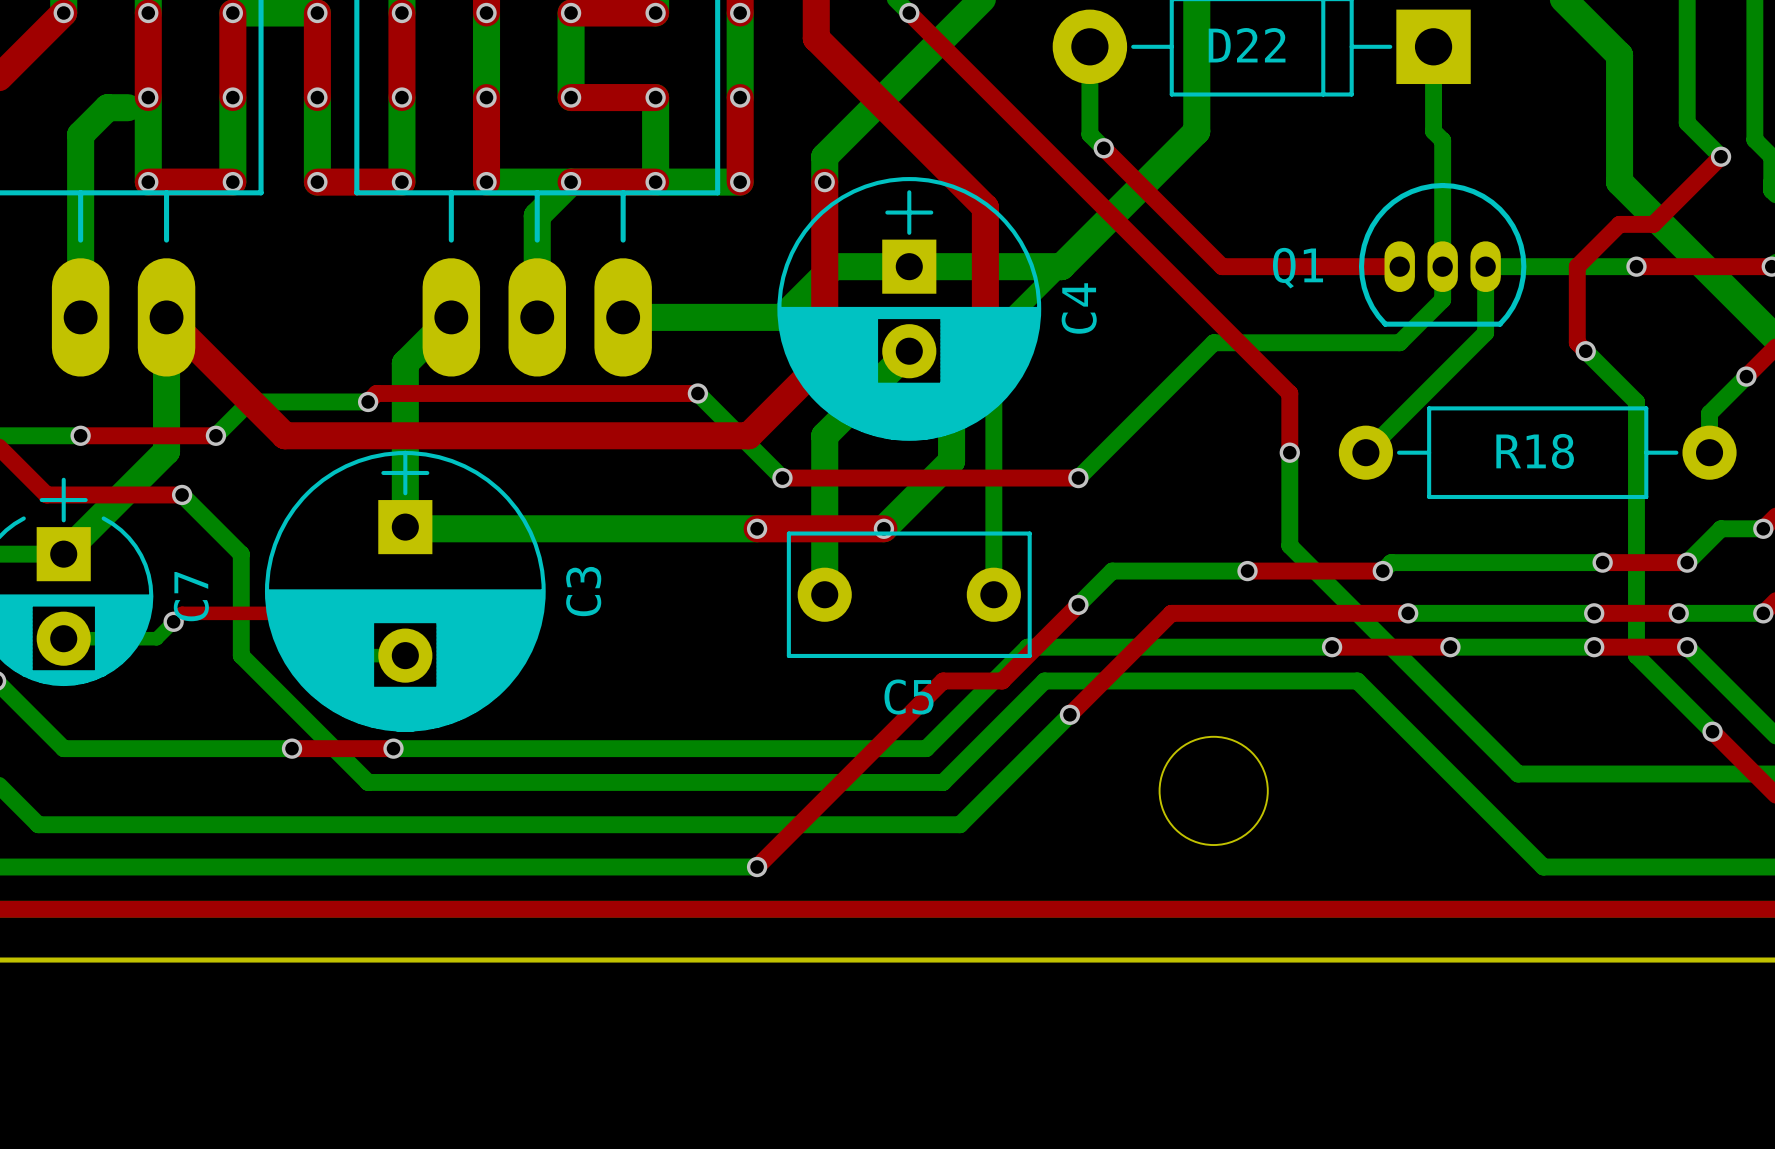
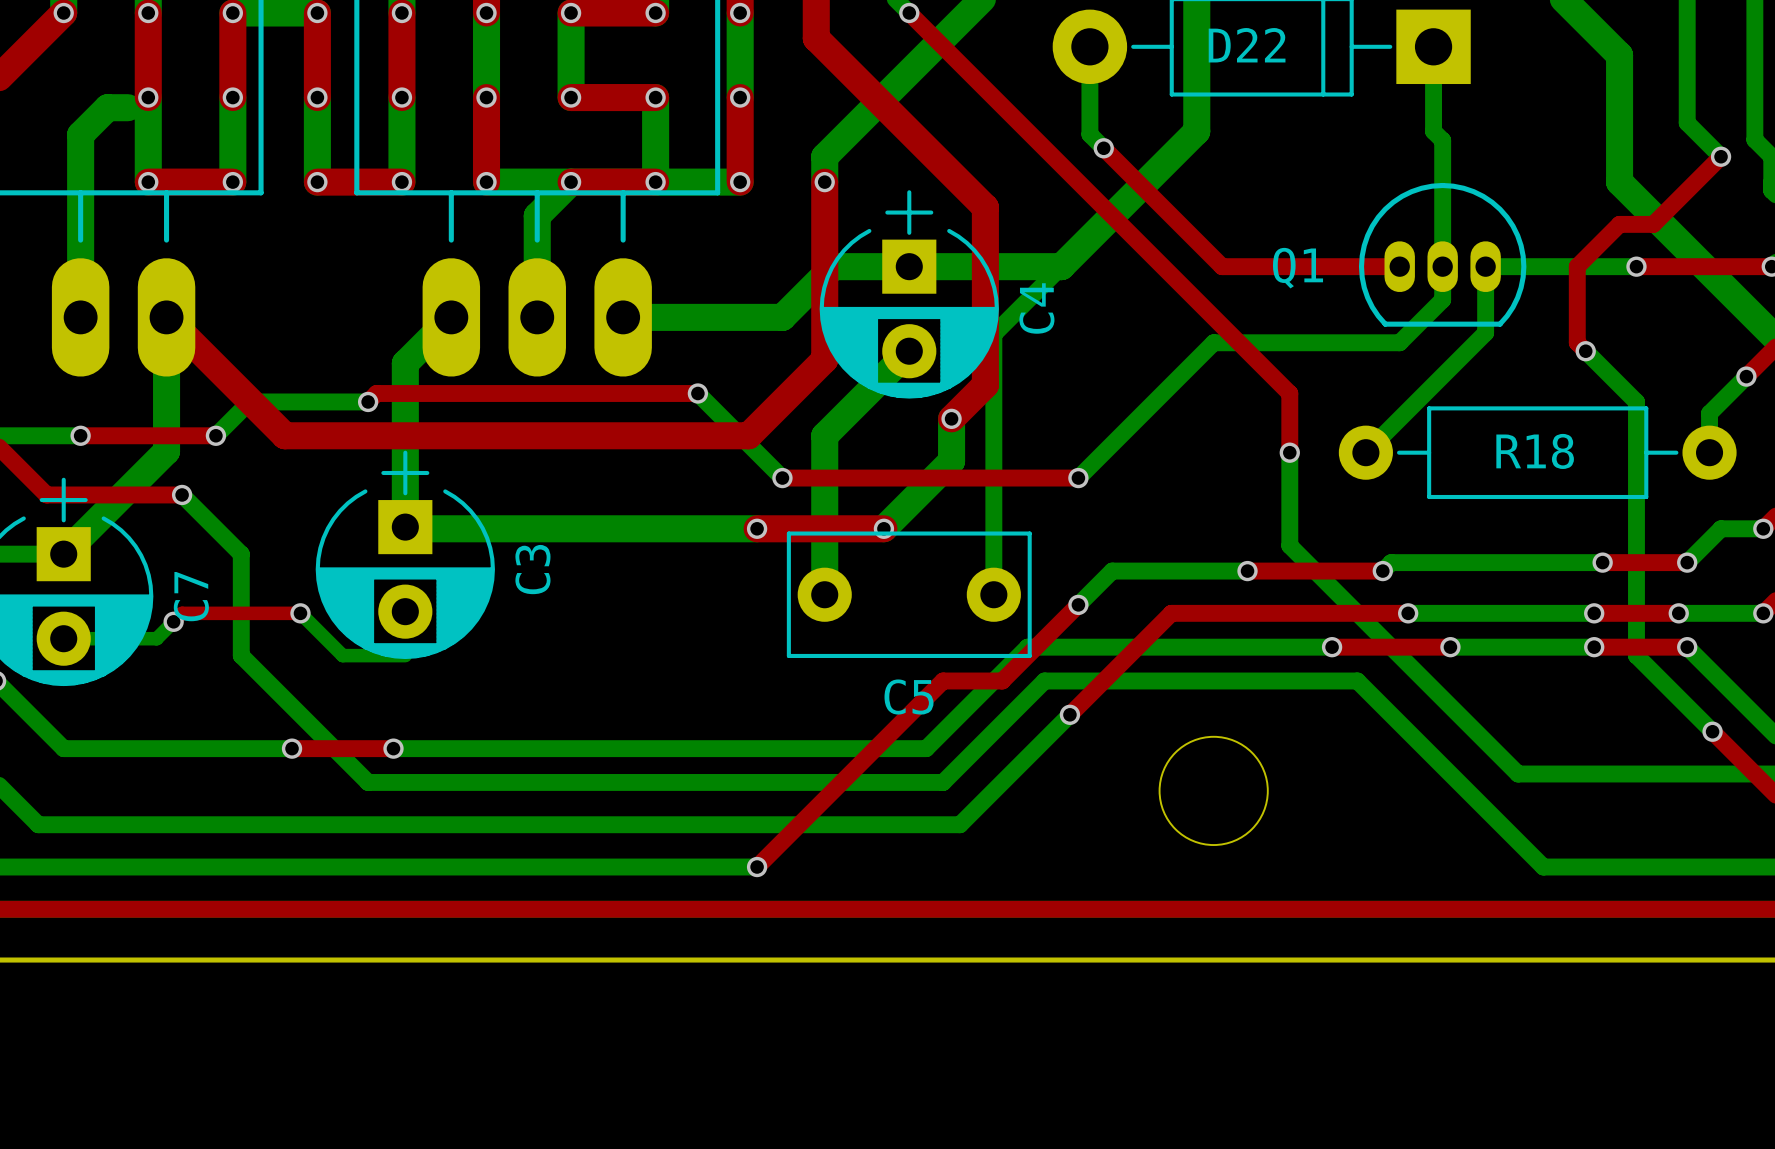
C4 footprint: [777, 177, 1042, 441] -> [819, 190, 999, 399]
C3 footprint: [264, 450, 546, 732] -> [315, 450, 495, 660]

